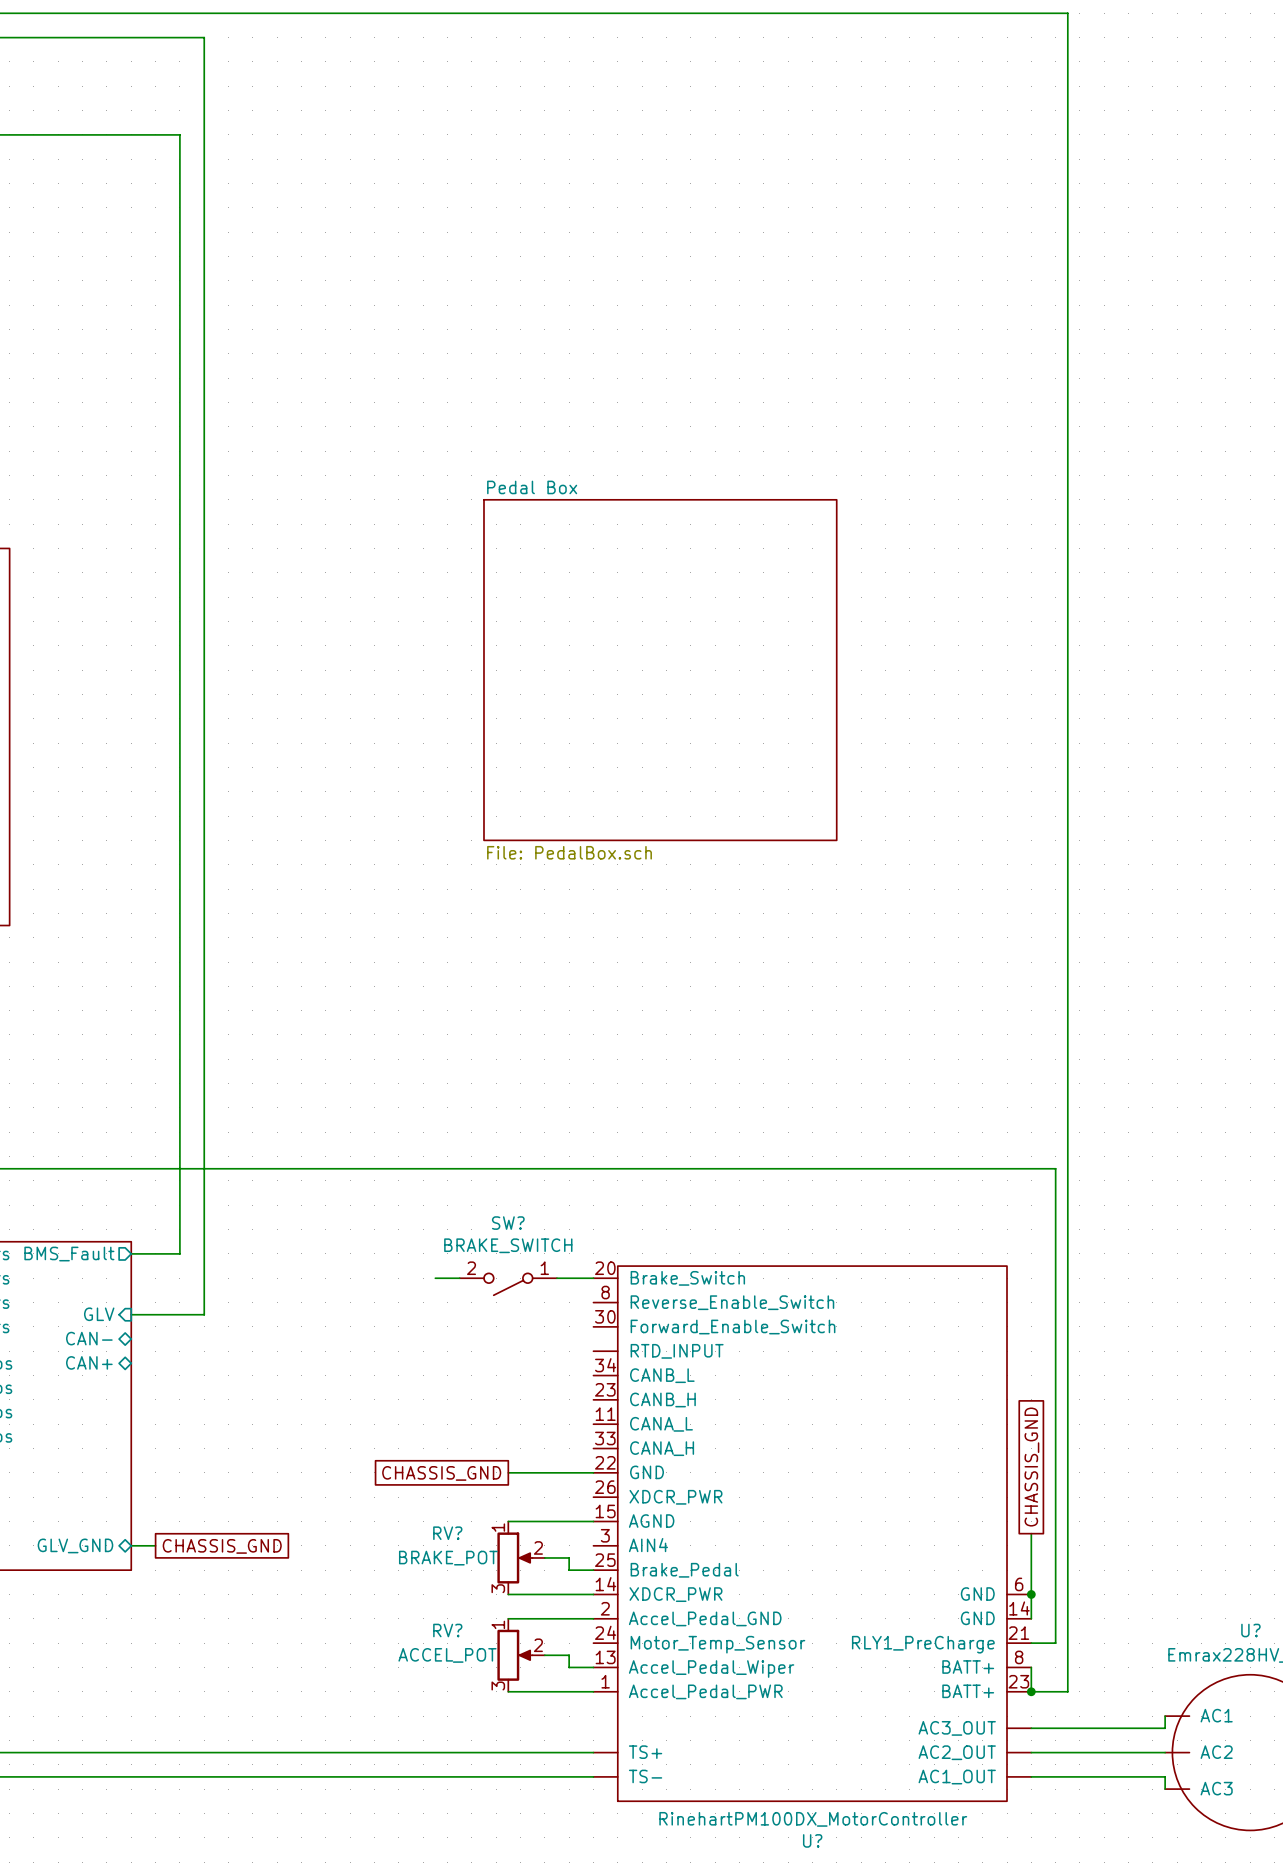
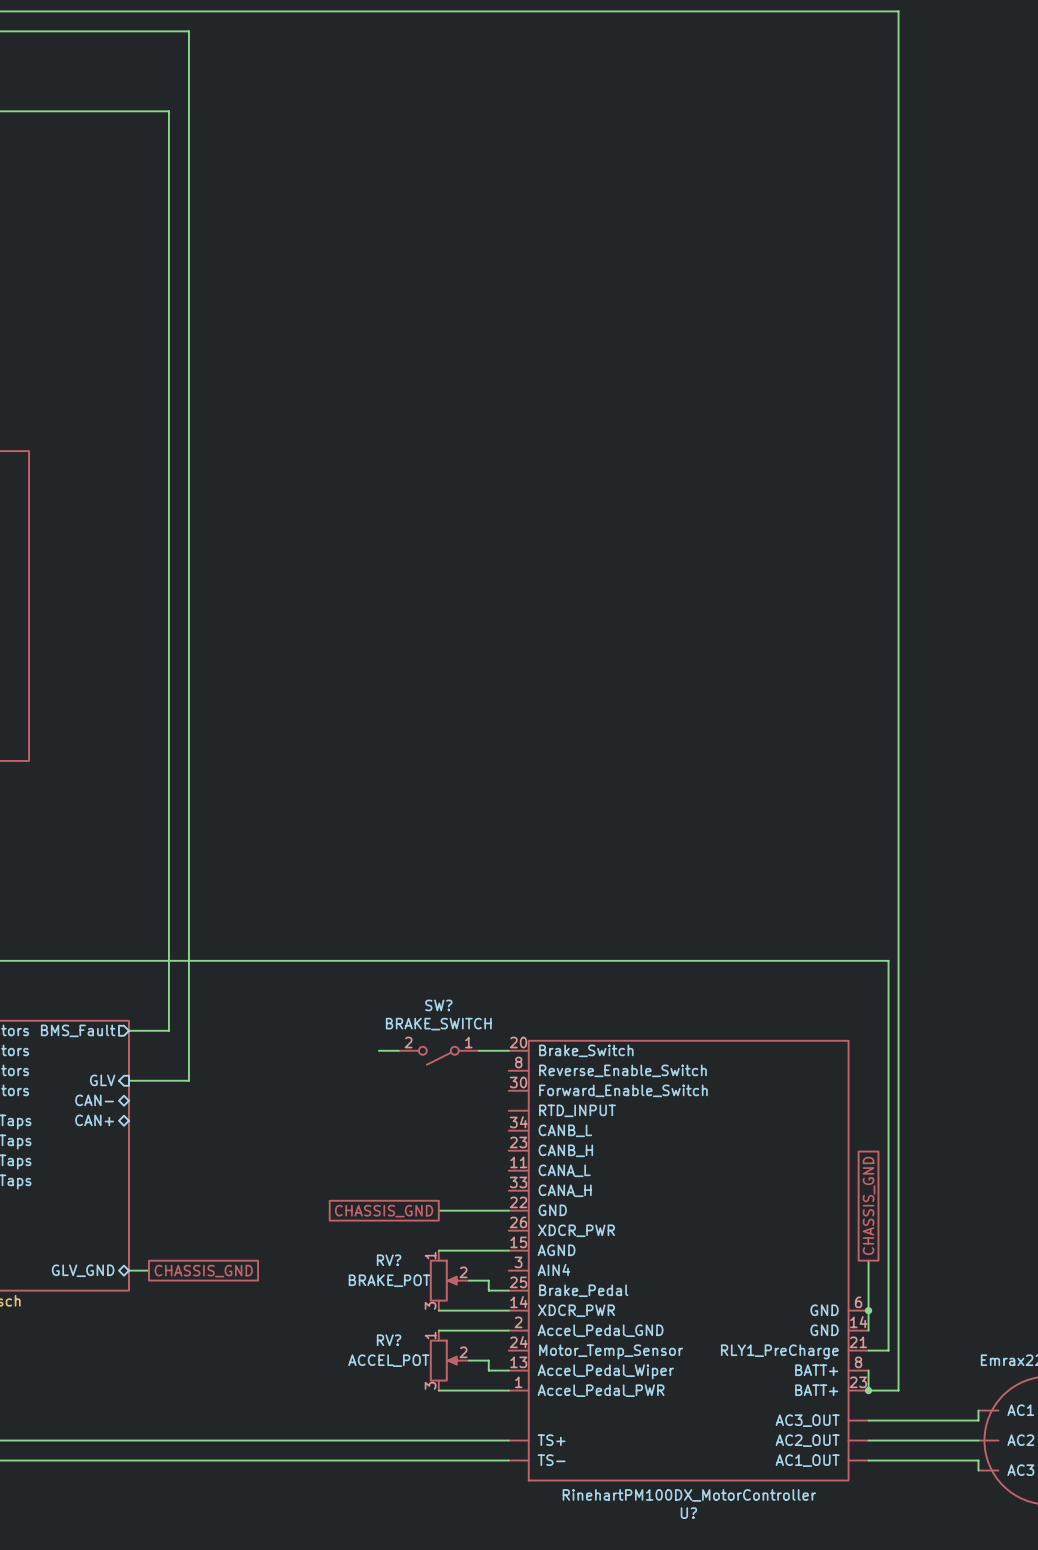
sheet Pedal Box: File: PedalBox.sch (660, 670) -> none

